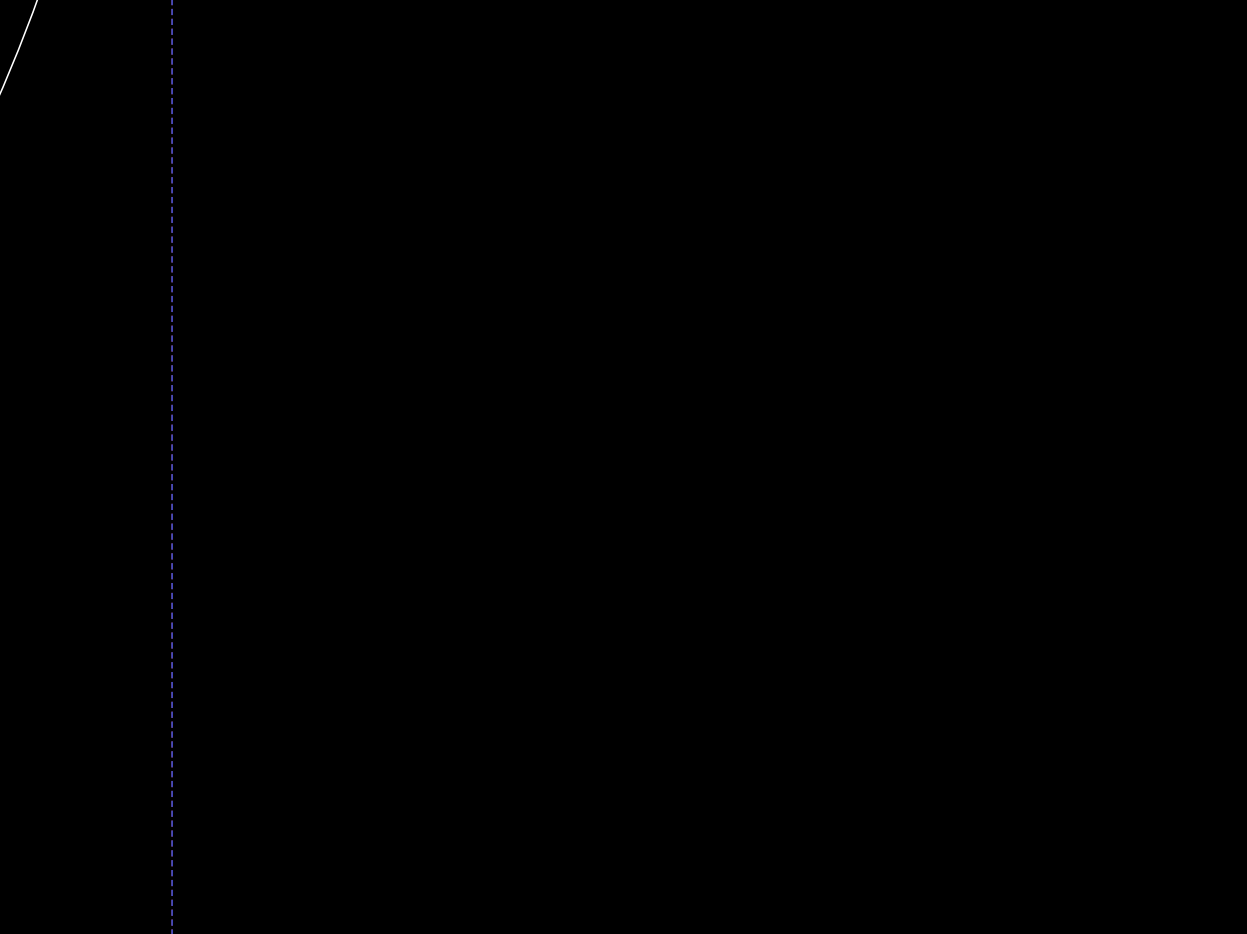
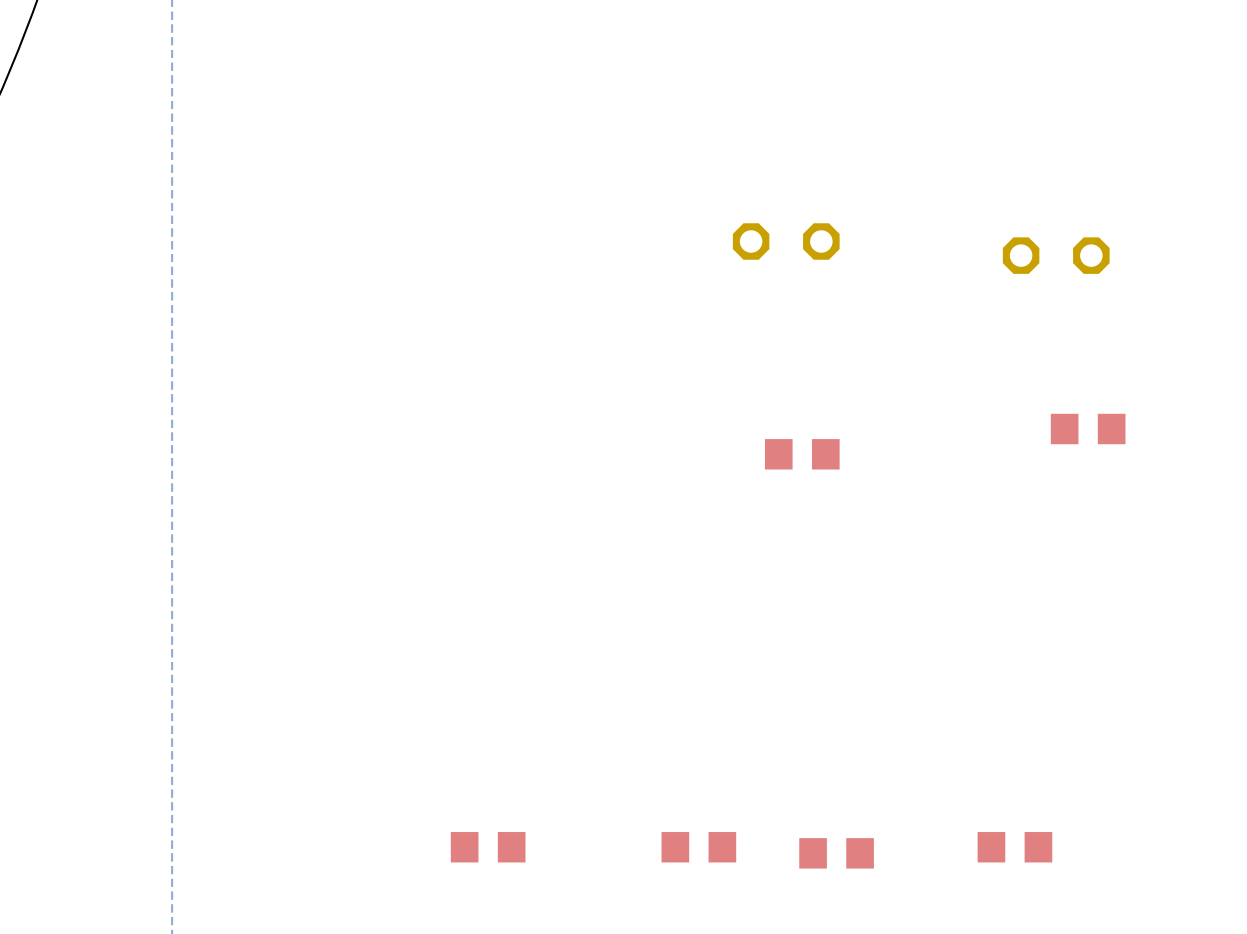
part: none -> (786, 241)
part: none -> (1056, 255)
part: none -> (1088, 429)
part: none -> (802, 454)
part: none -> (488, 847)
part: none -> (698, 847)
part: none -> (1014, 847)
part: none -> (836, 853)

